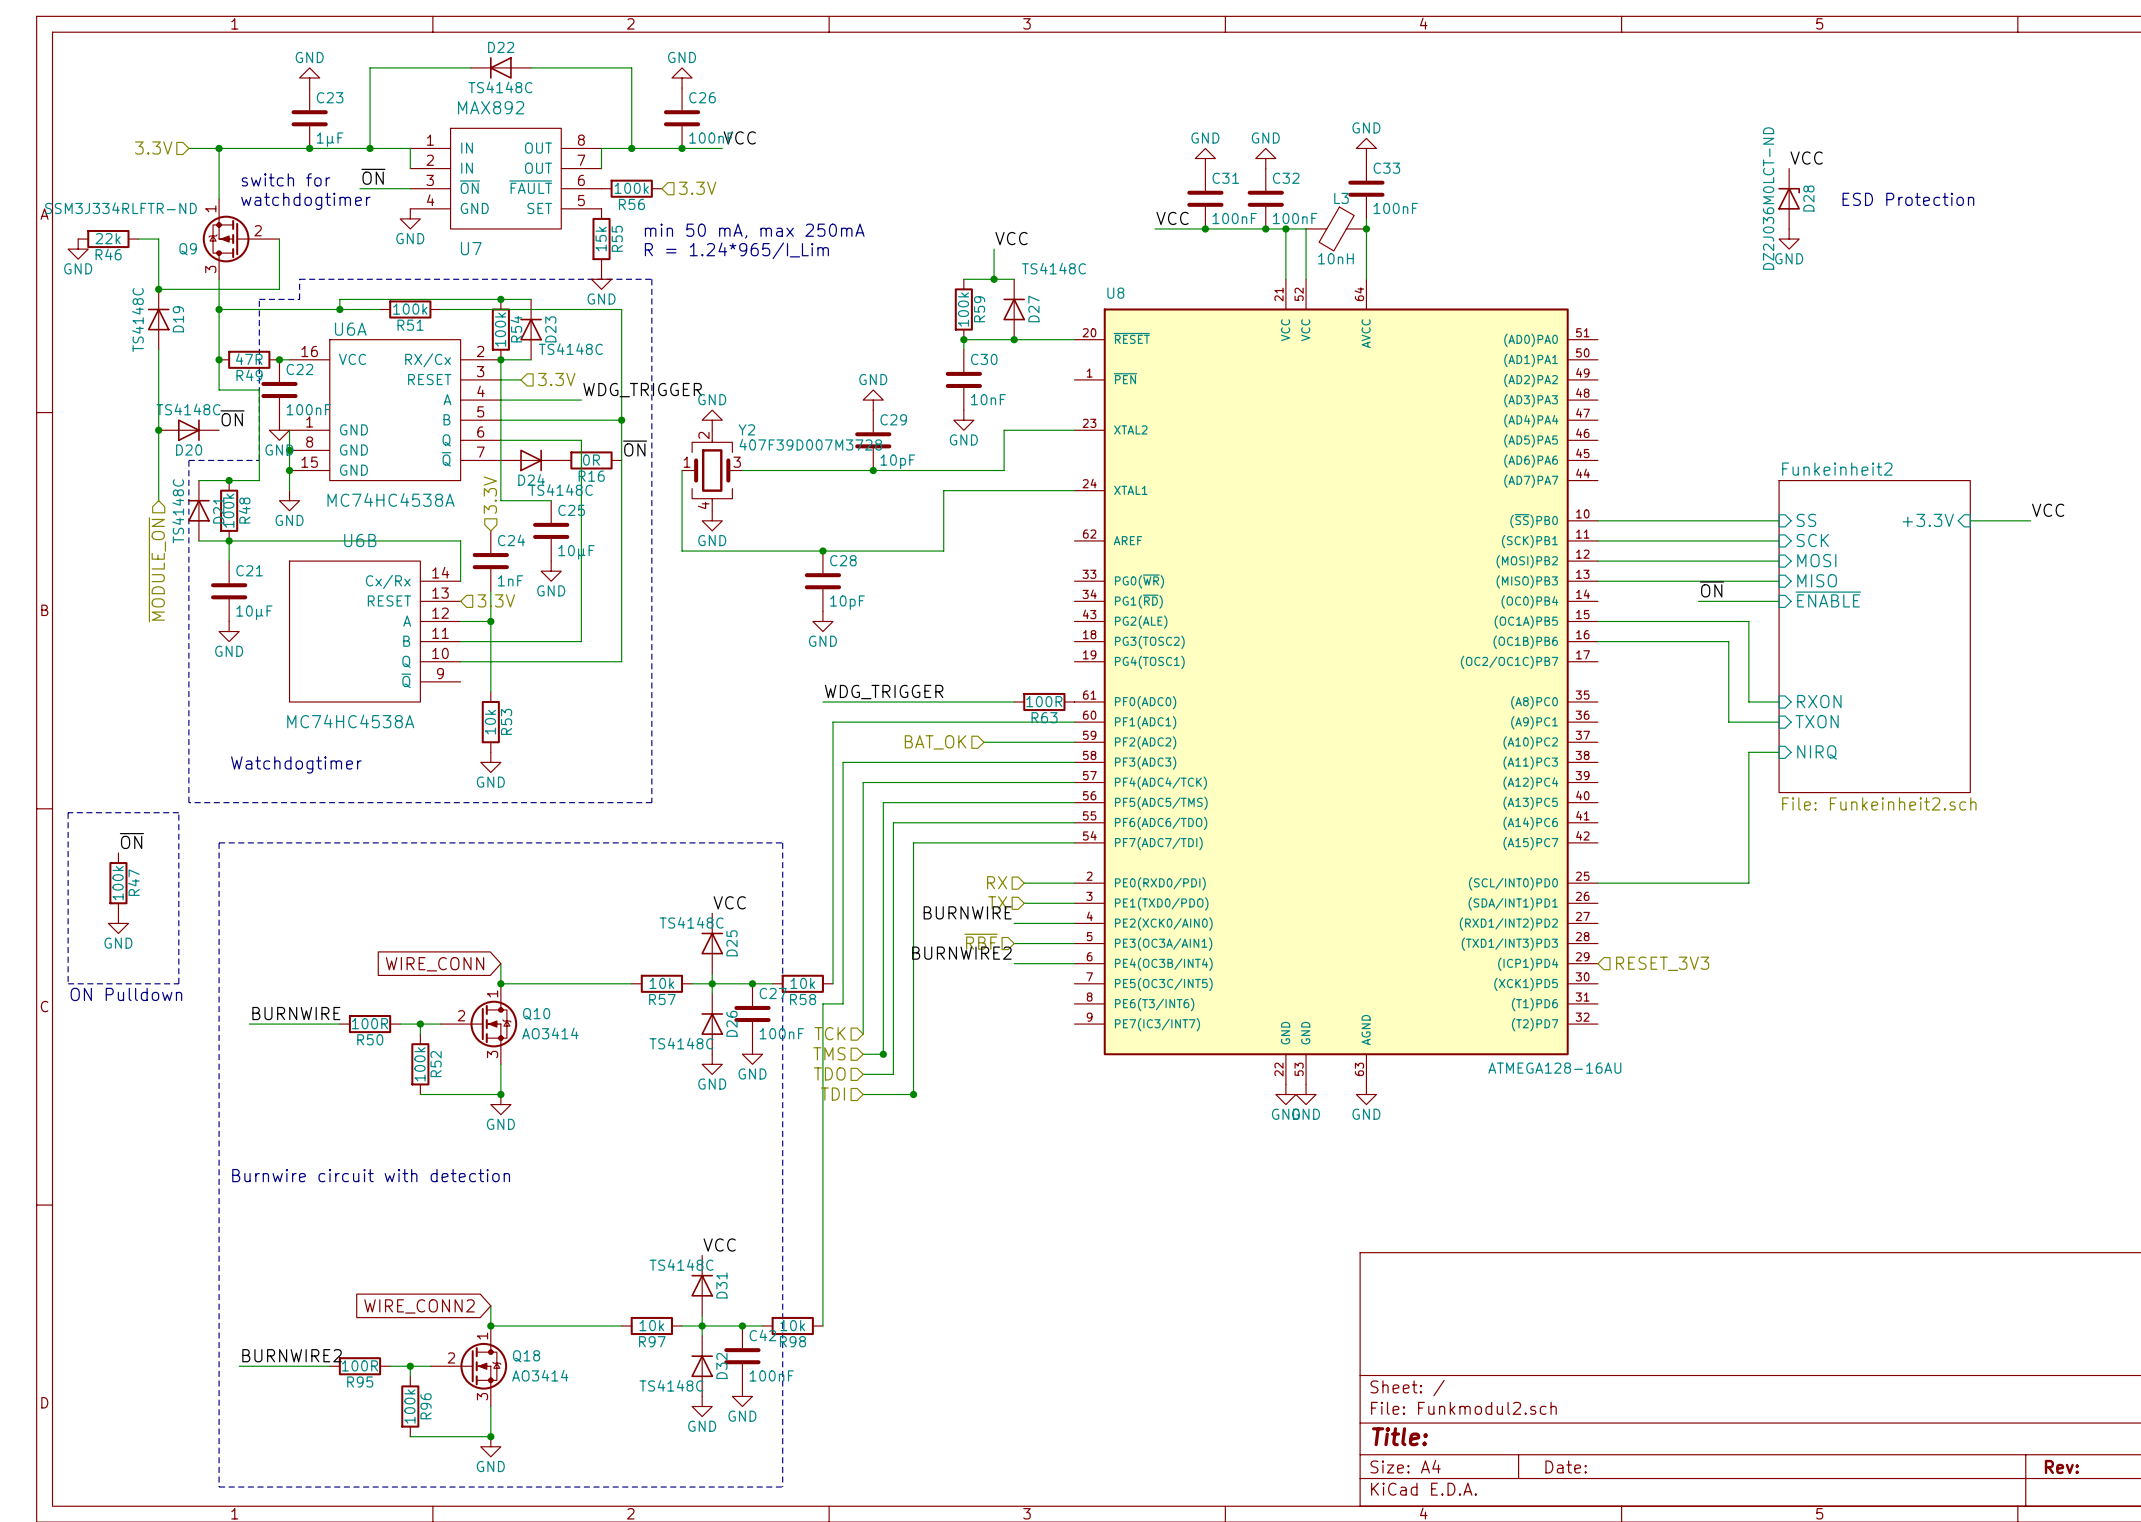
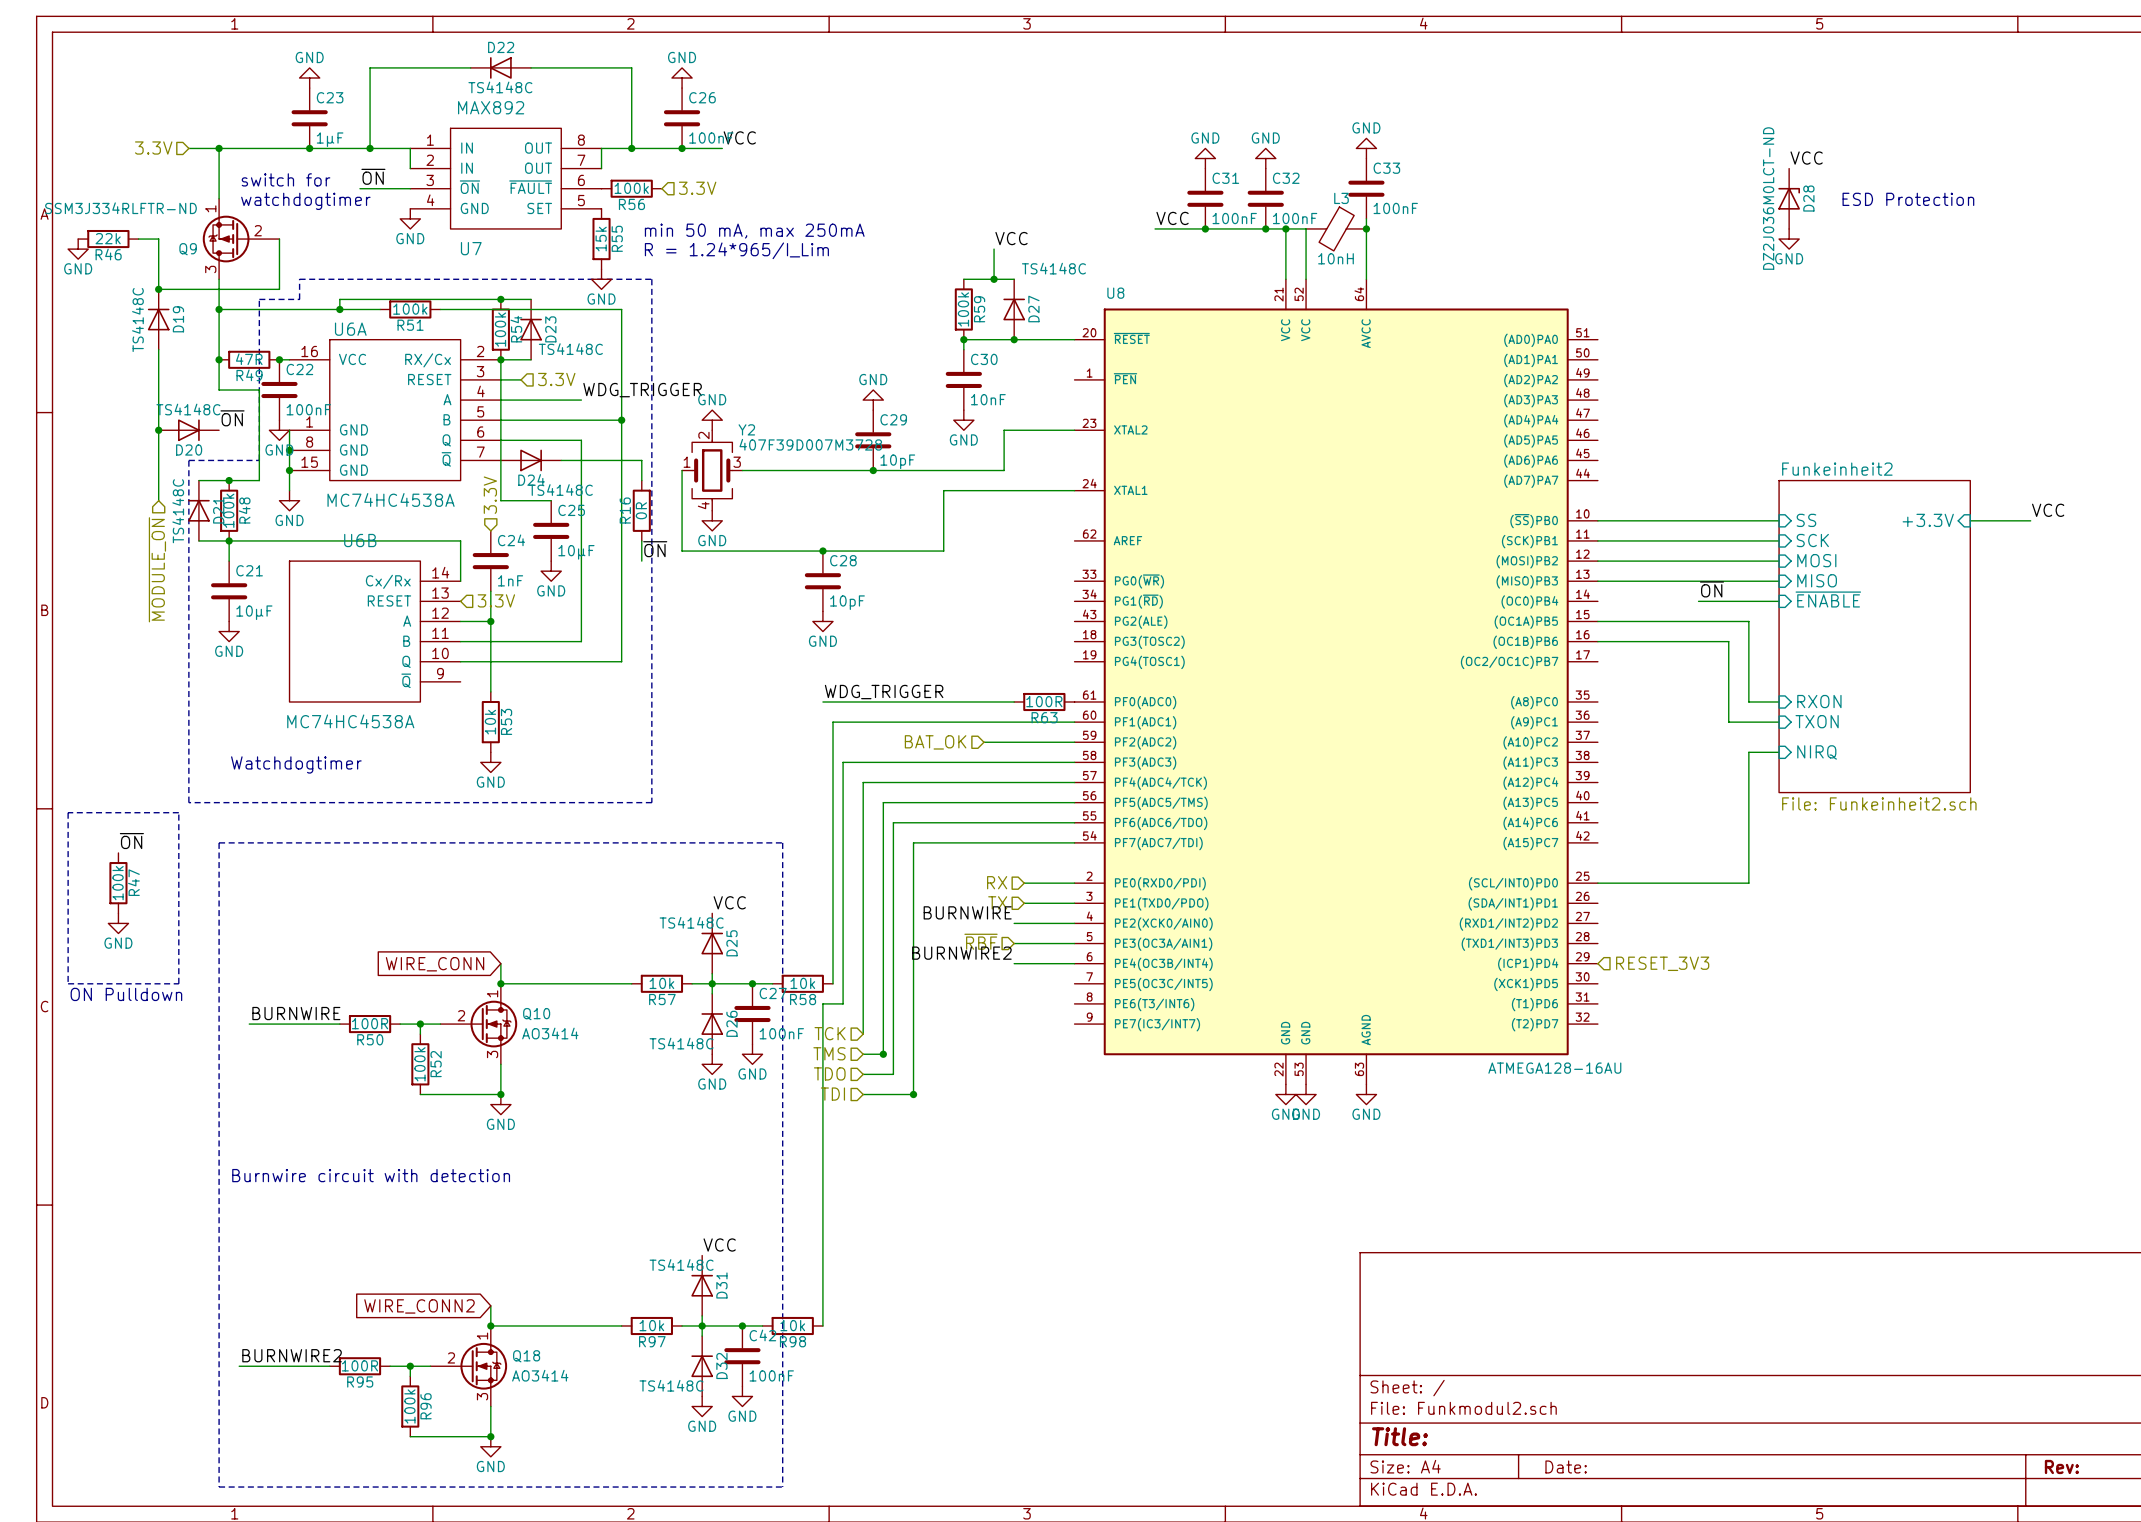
label position: ~{ON} (635, 448) -> ~{ON} (655, 549)
wire: none -> (561, 460) (641, 460) (641, 480)
R16 rotation: 0° (591, 460) -> 90° clockwise (641, 510)
R16 position: (591, 460) -> (641, 510)
wire: none -> (641, 540) (641, 561)

